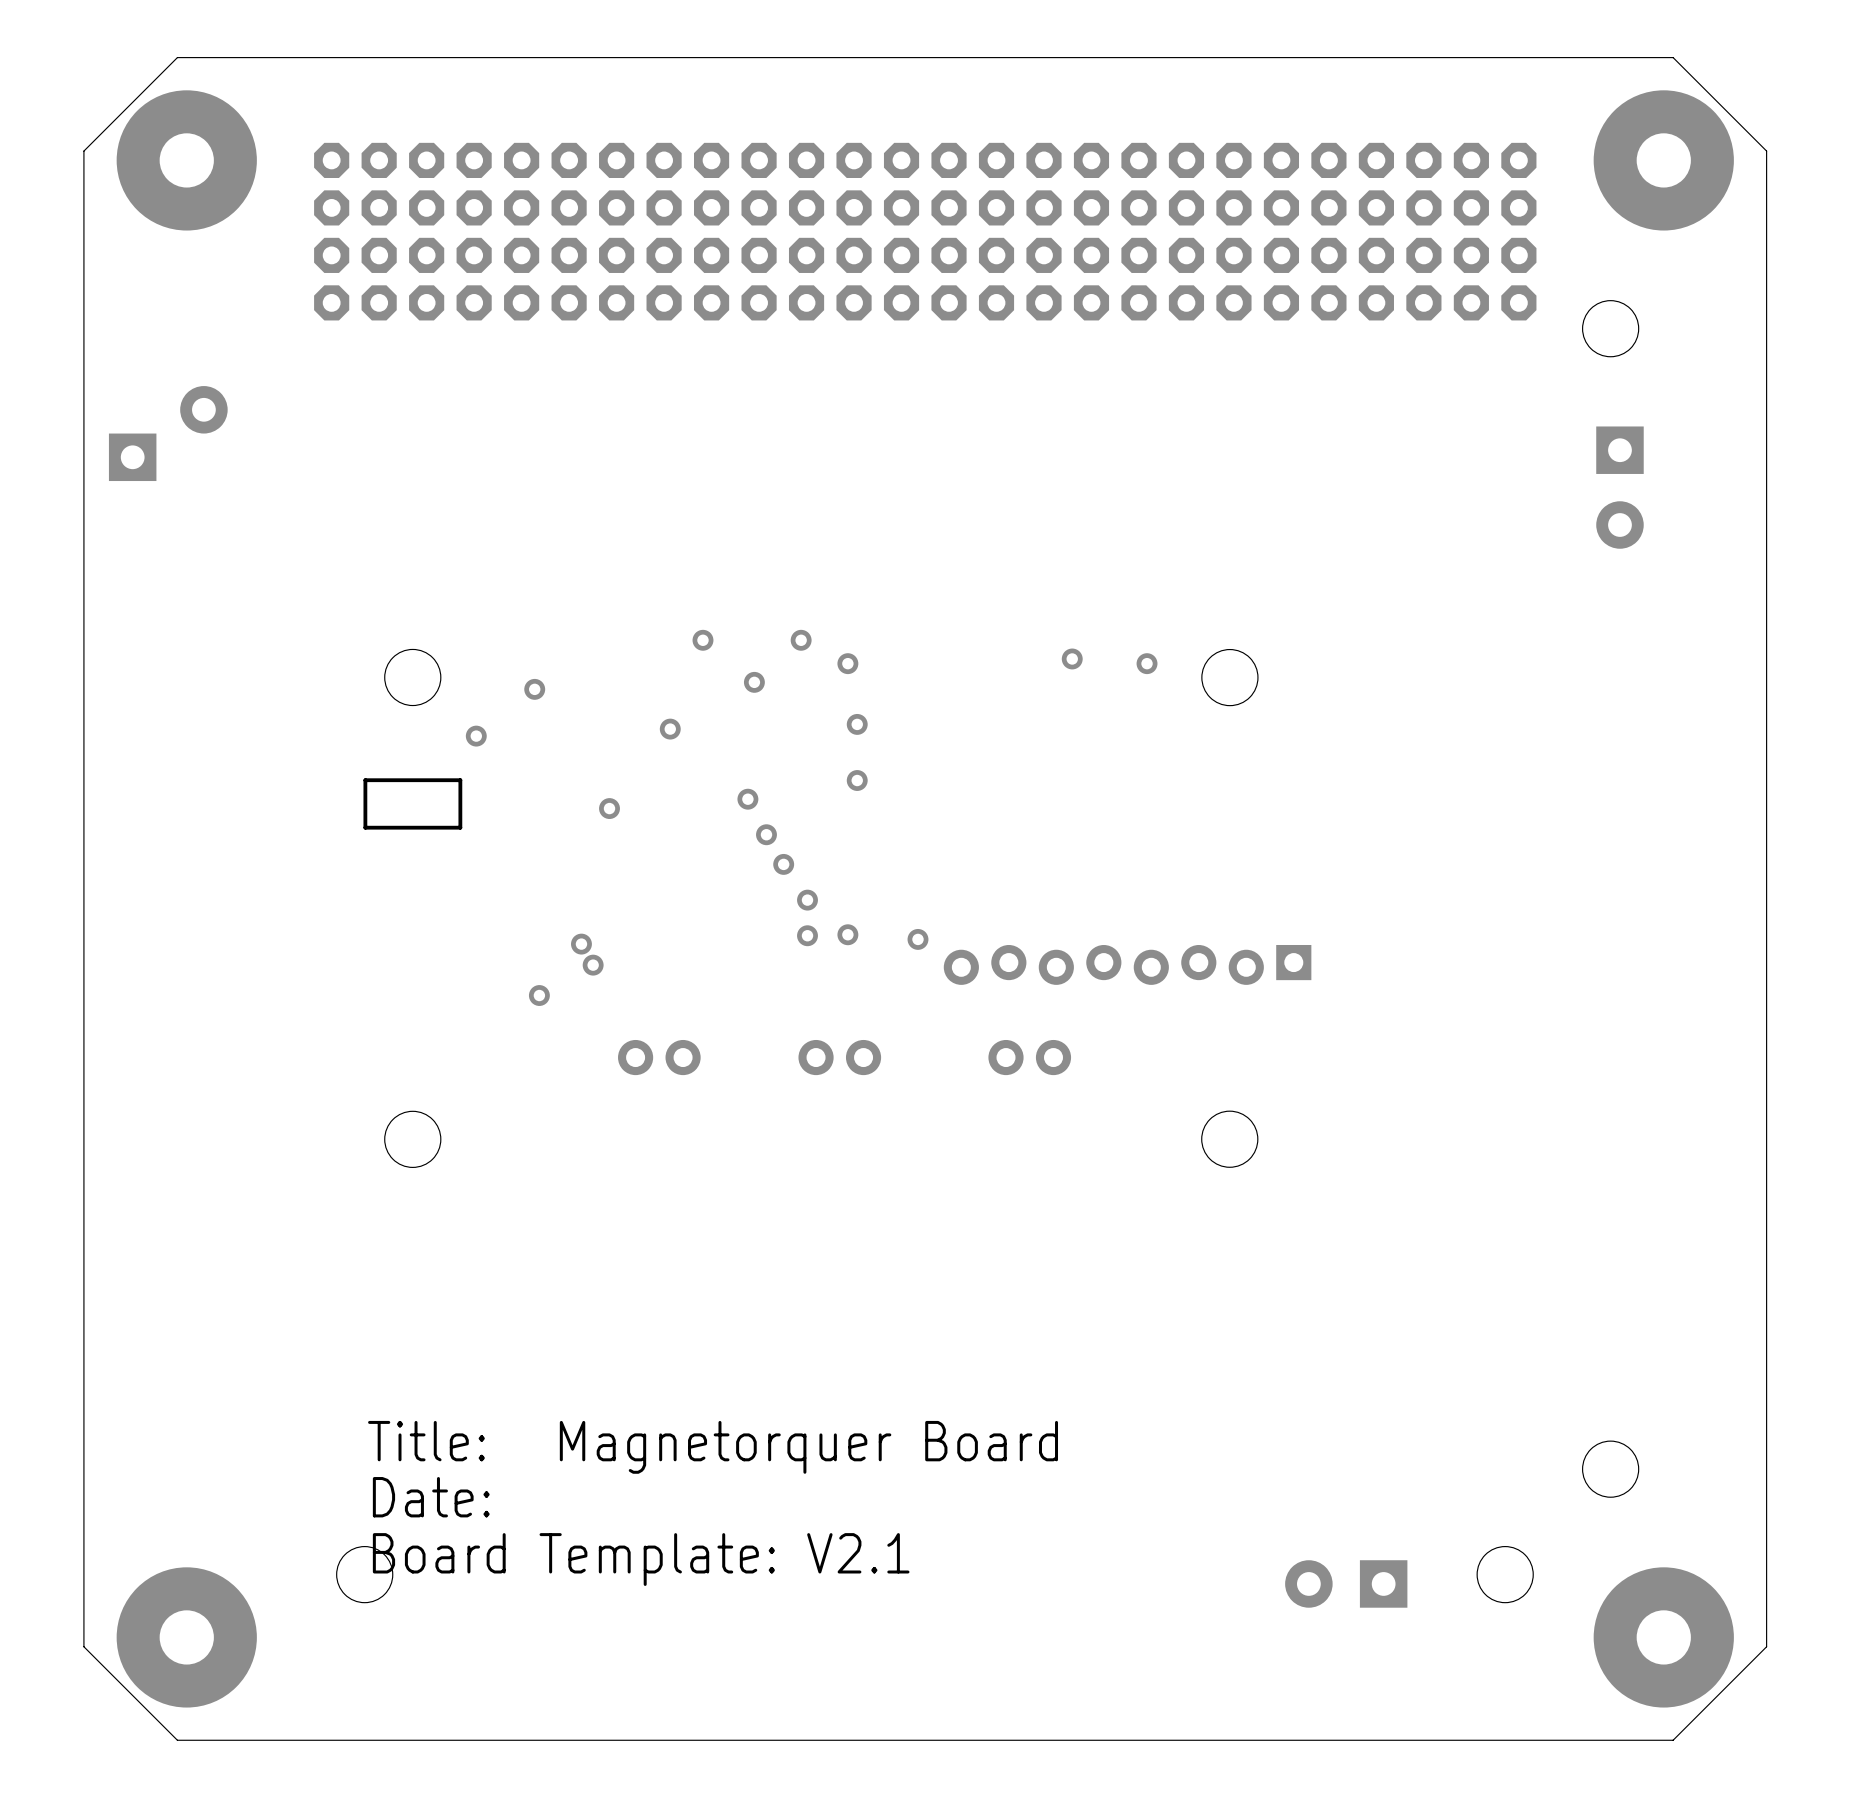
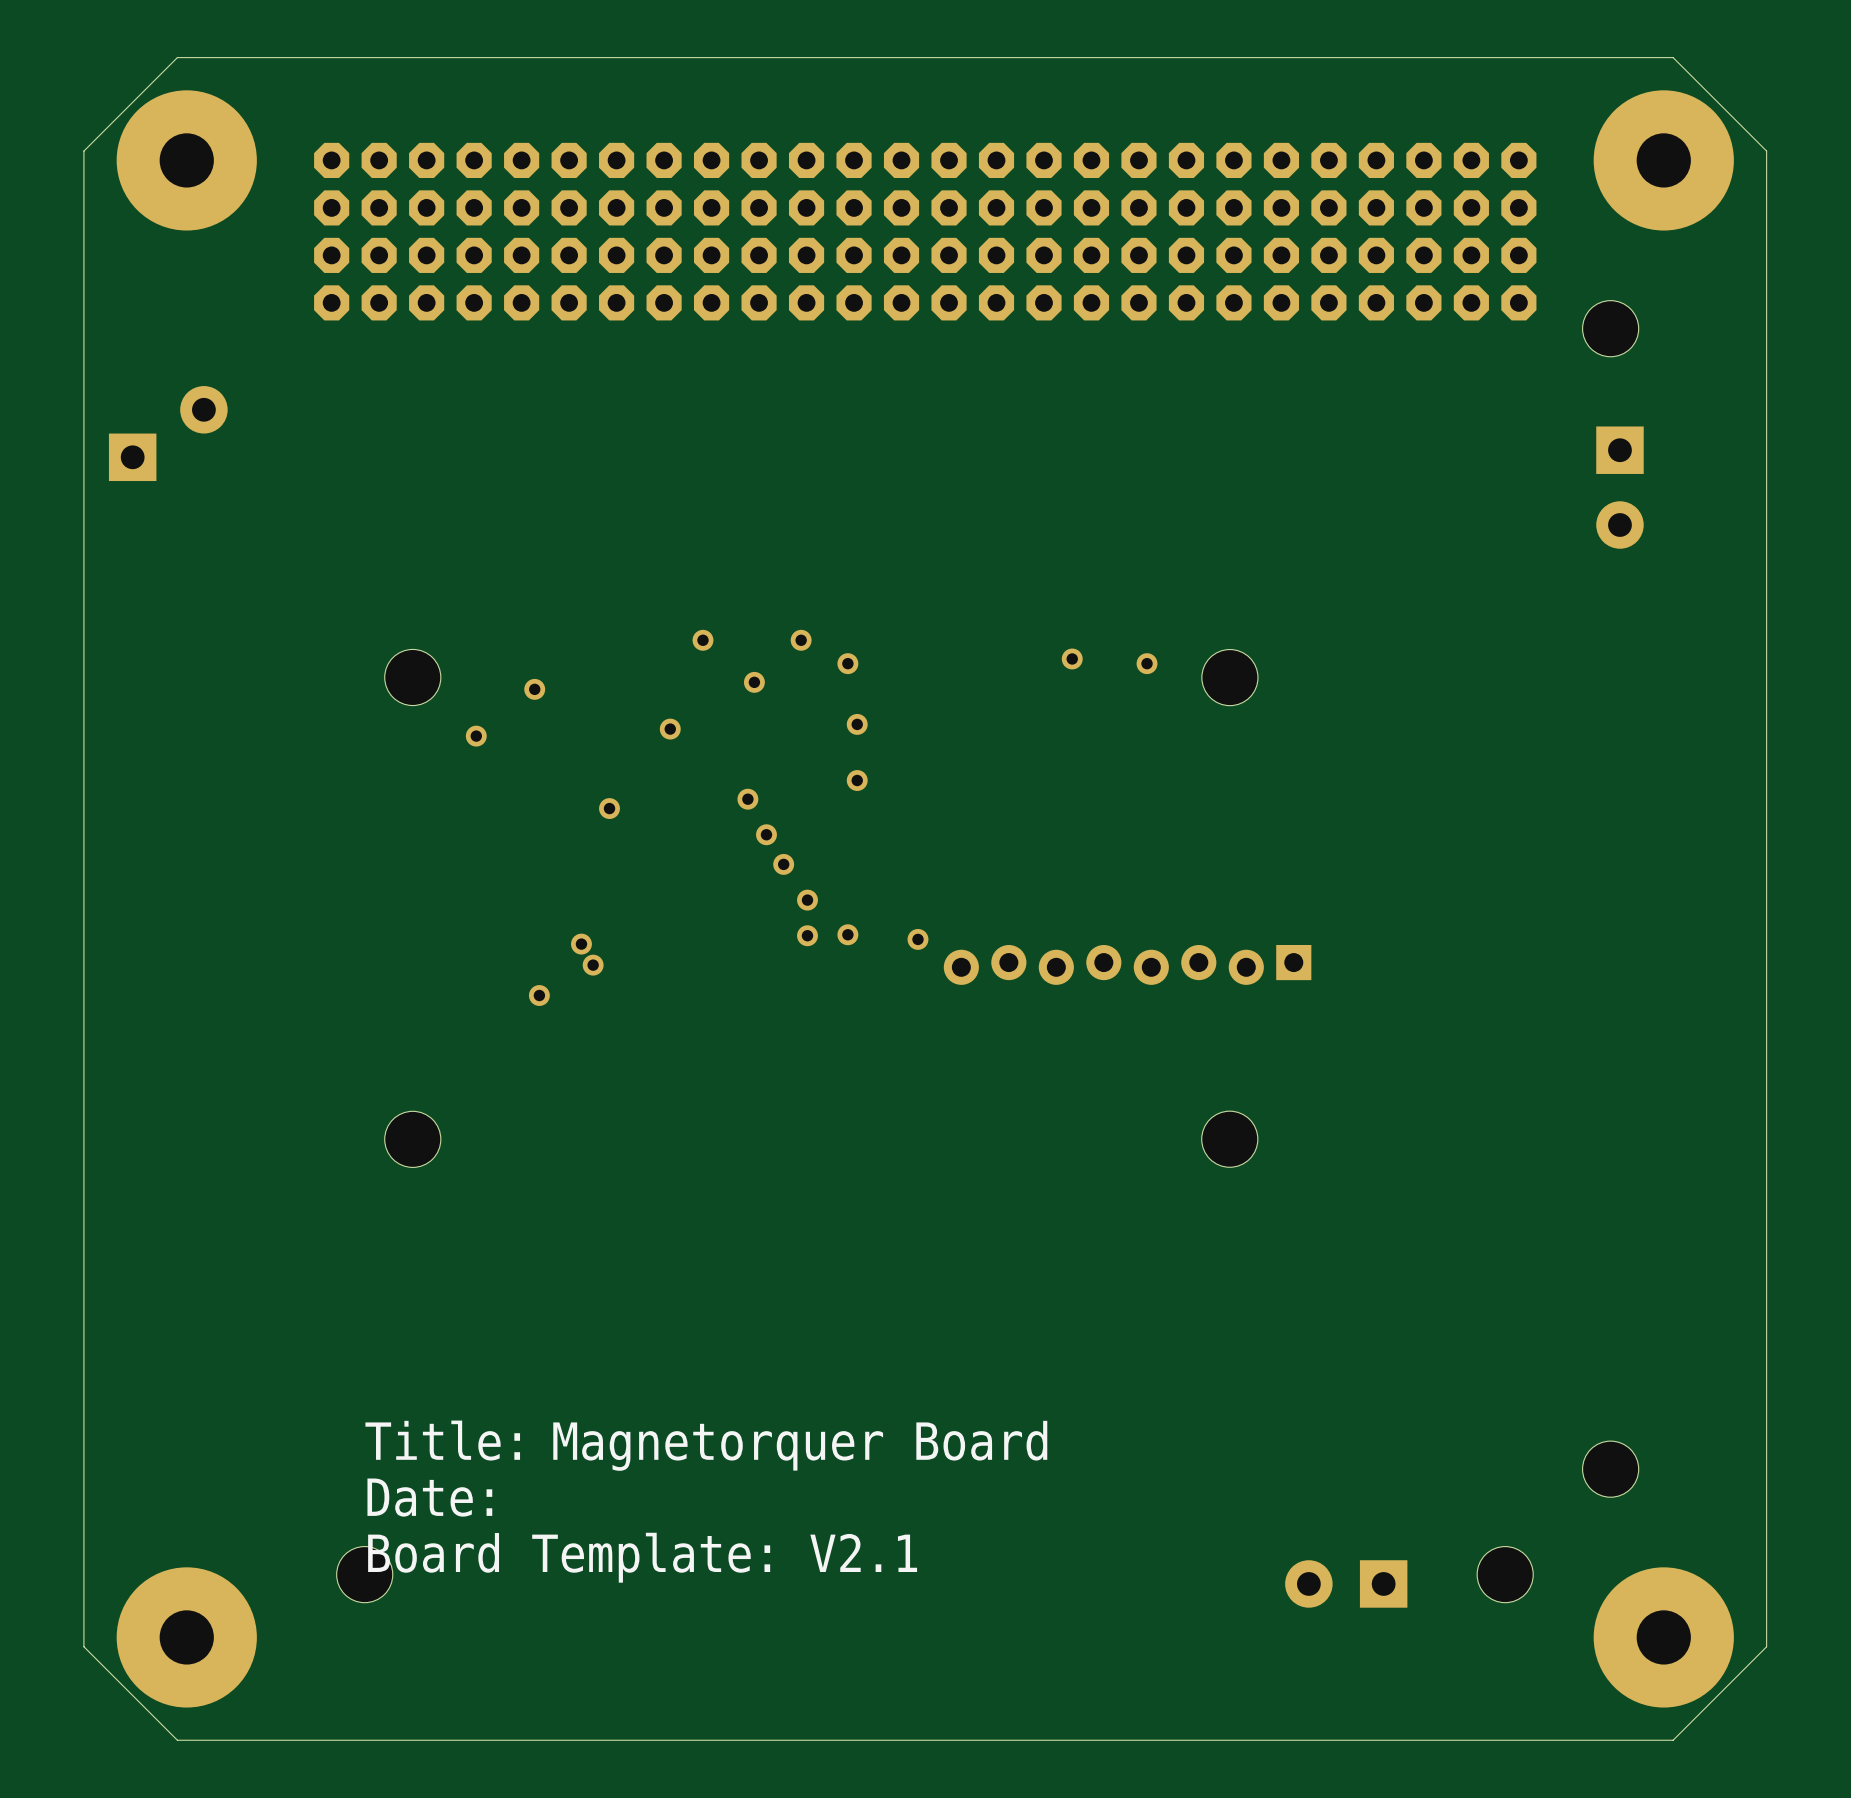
part: (412, 803) -> none
part: (659, 1057) -> none
part: (839, 1057) -> none
part: (1029, 1057) -> none

